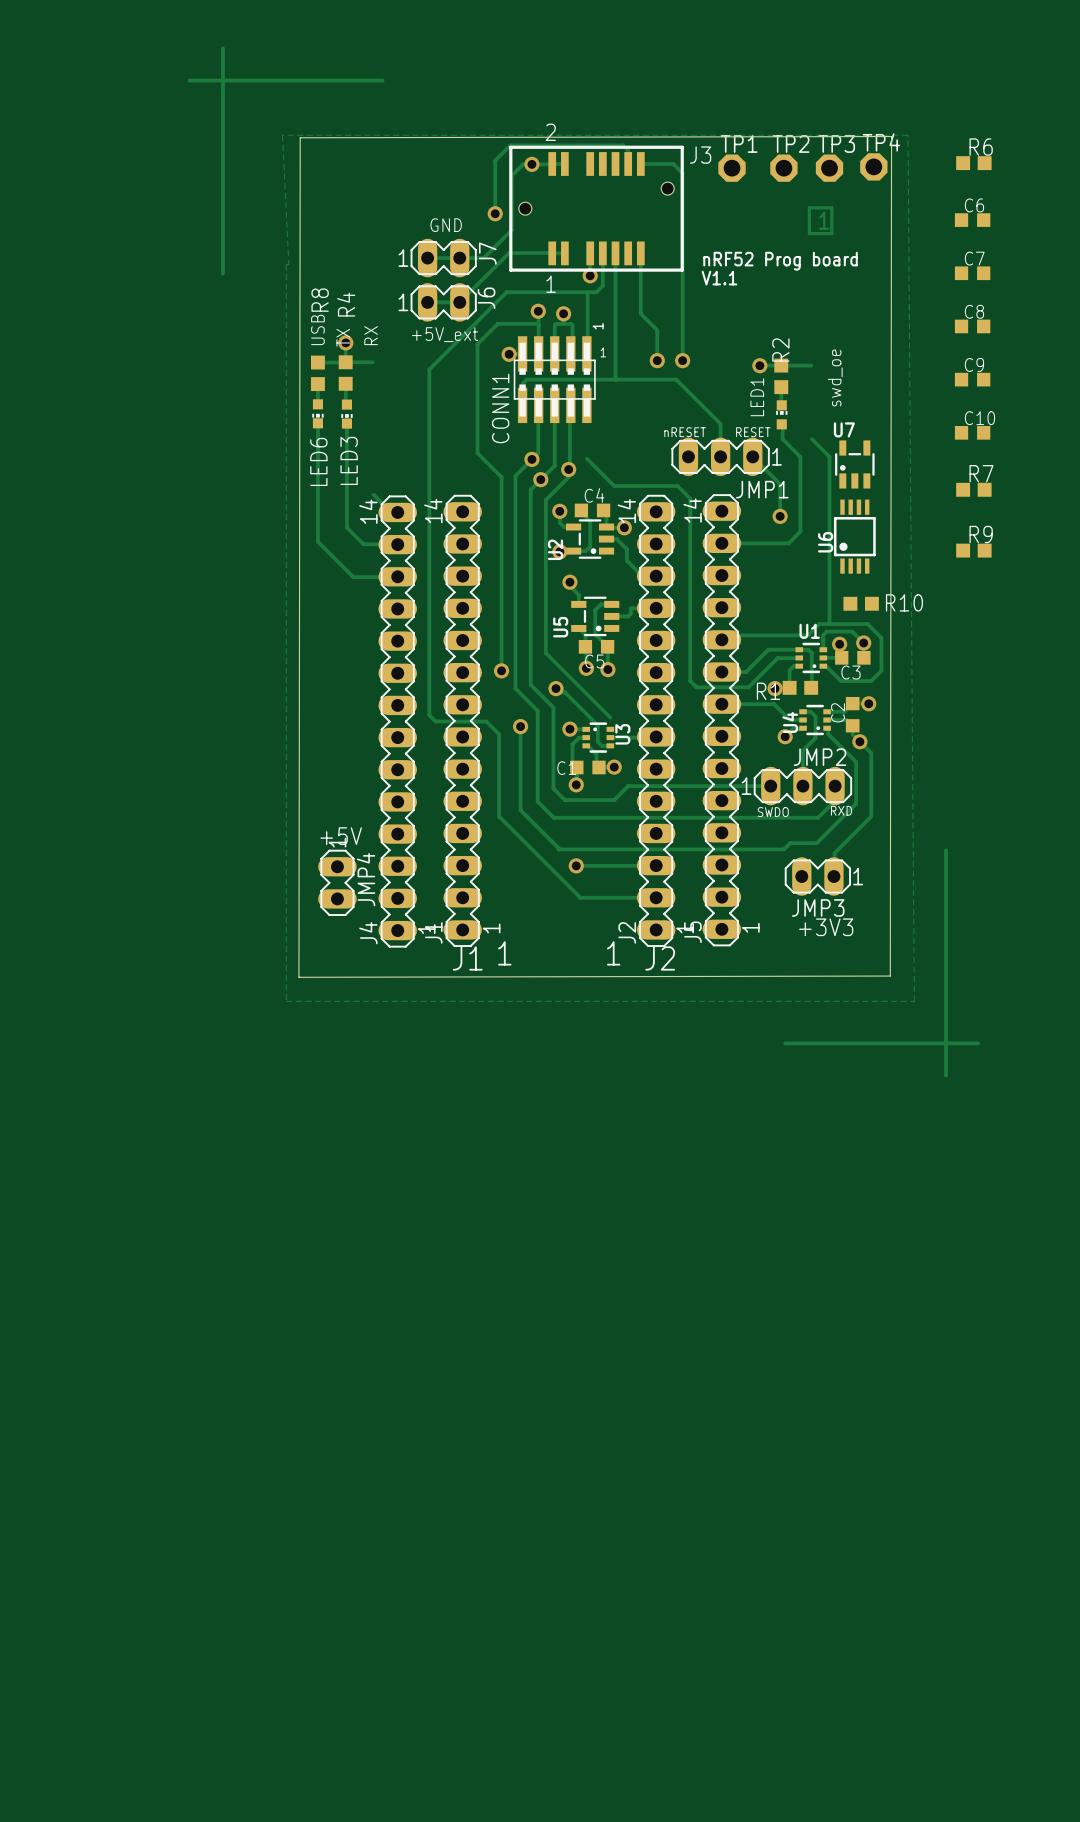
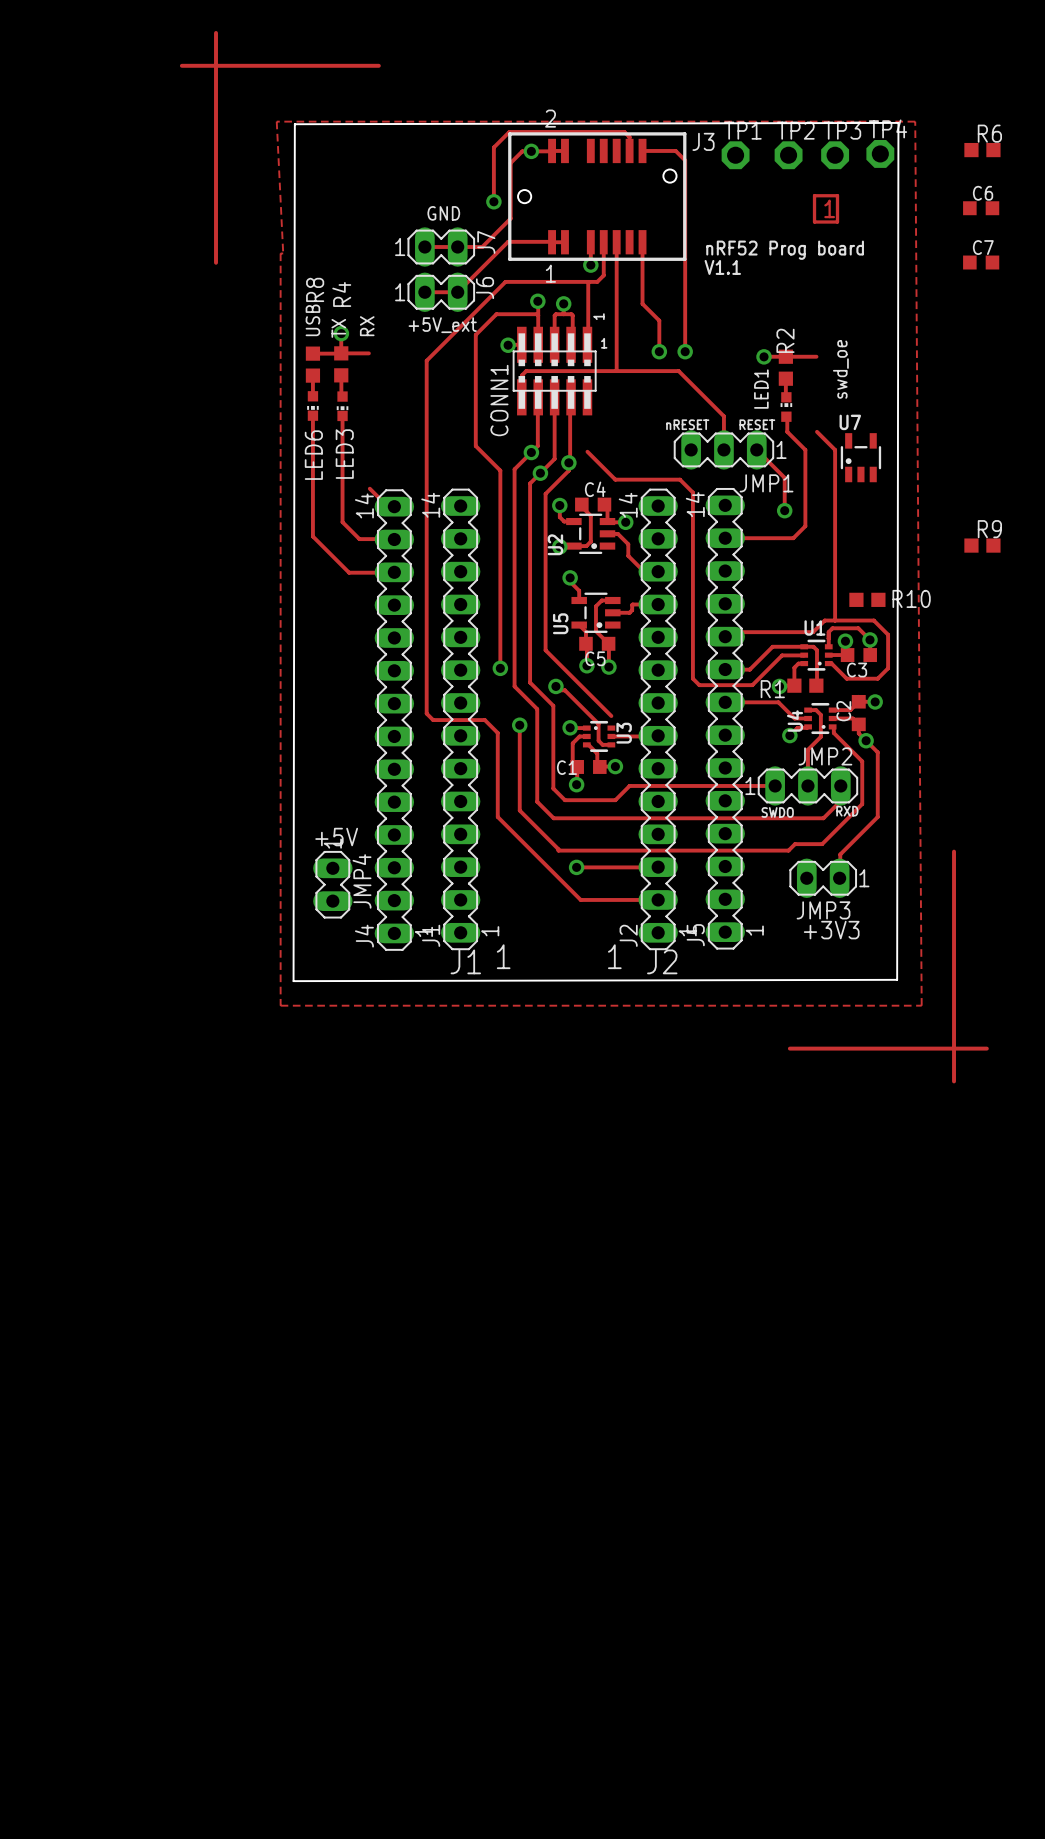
C8: (972, 326) -> none
C9: (972, 379) -> none
C10: (972, 432) -> none
R7: (973, 489) -> none
U6: (854, 536) -> none

